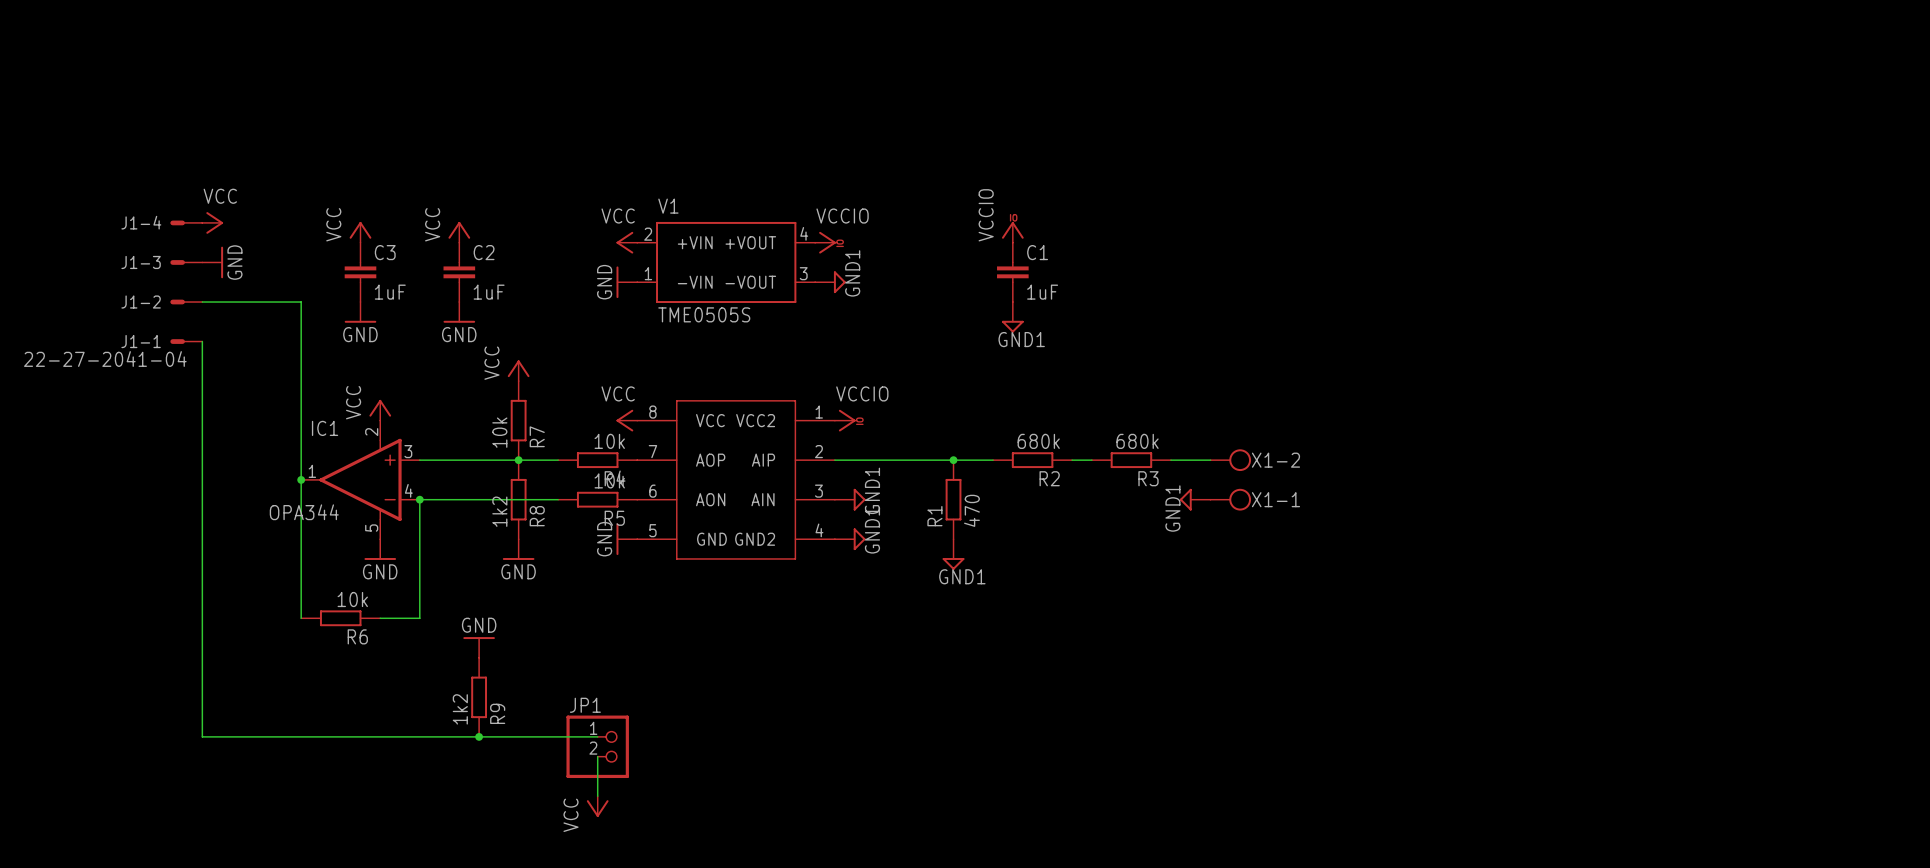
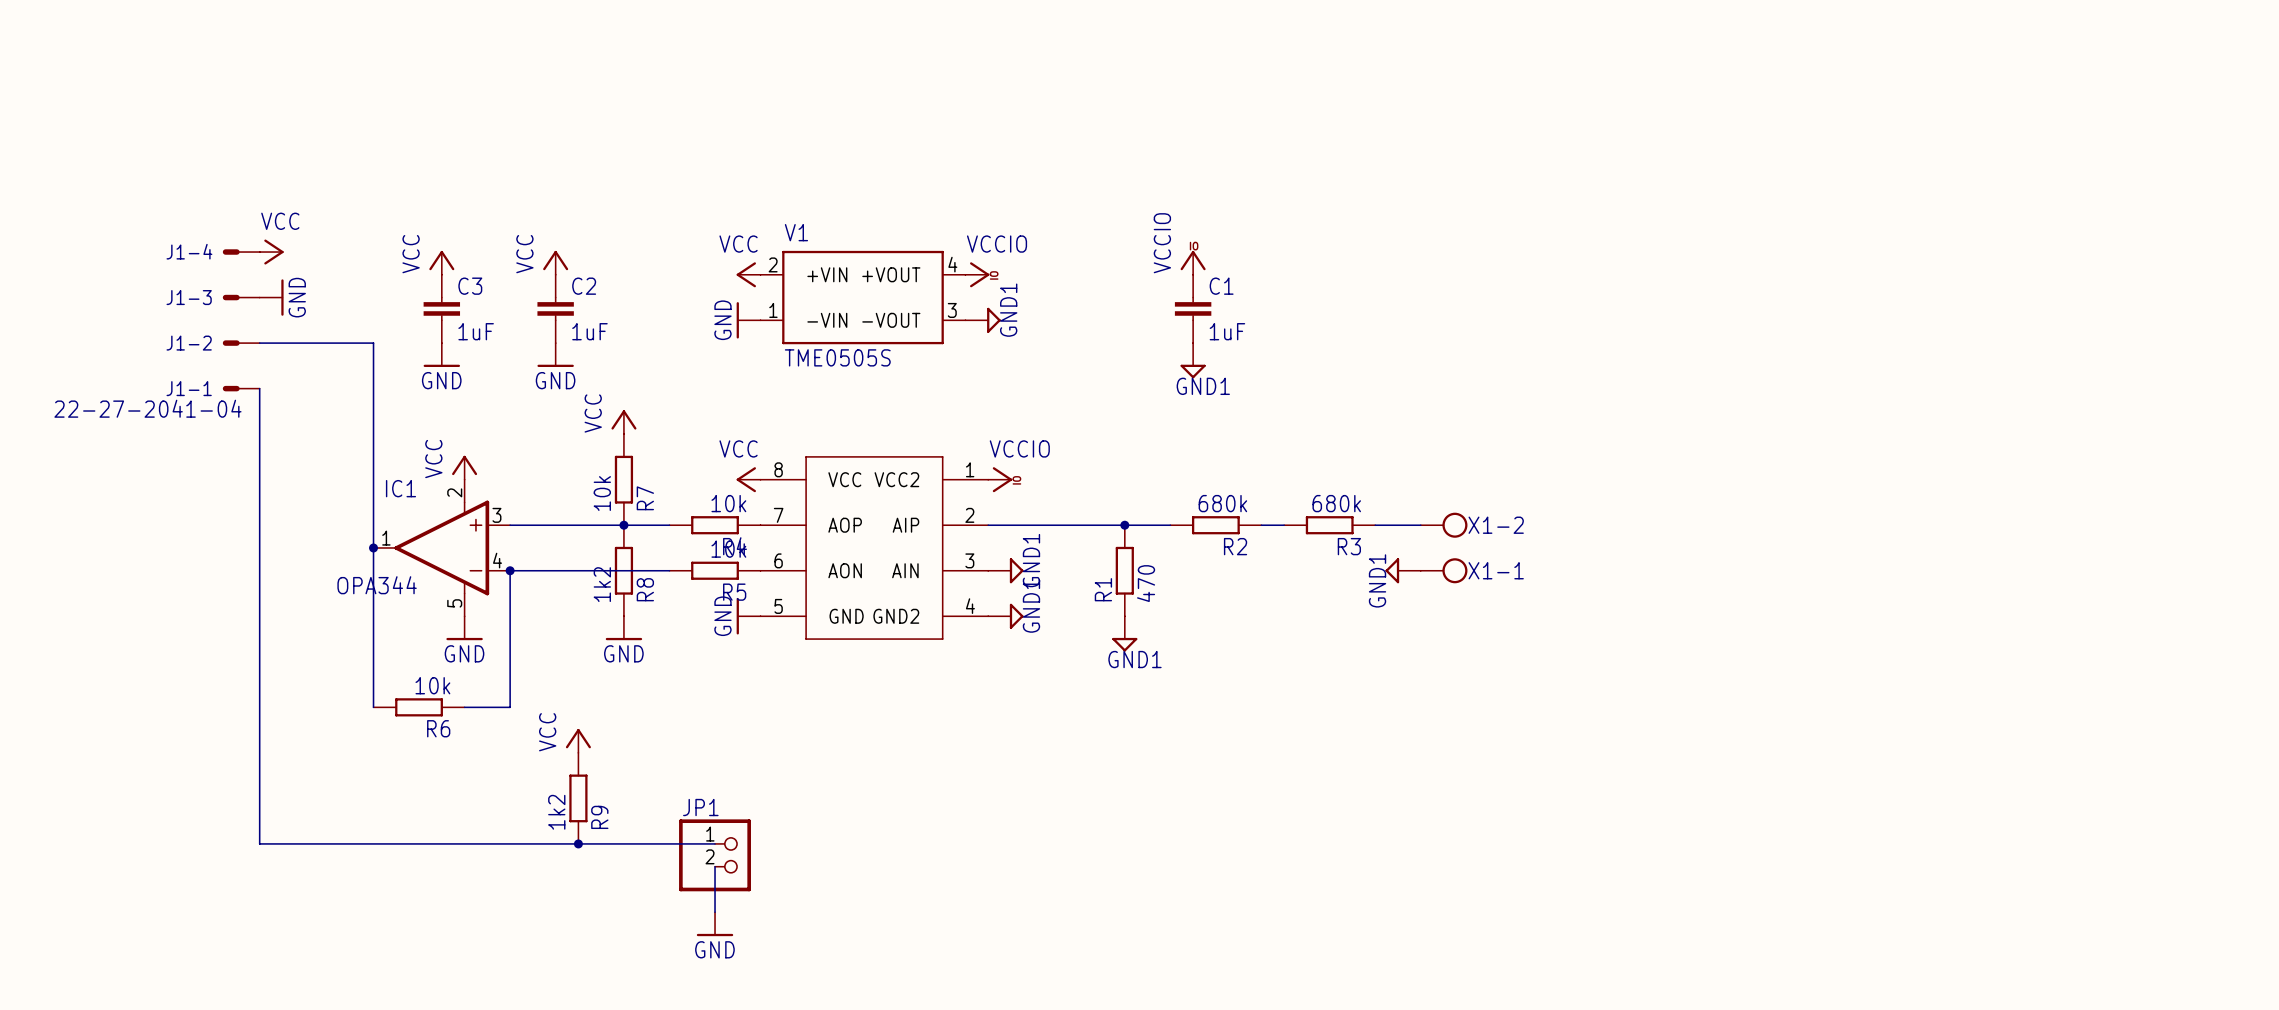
power symbol: GND (479, 647) -> VCC (578, 740)
power symbol: VCC (597, 806) -> GND (715, 924)

